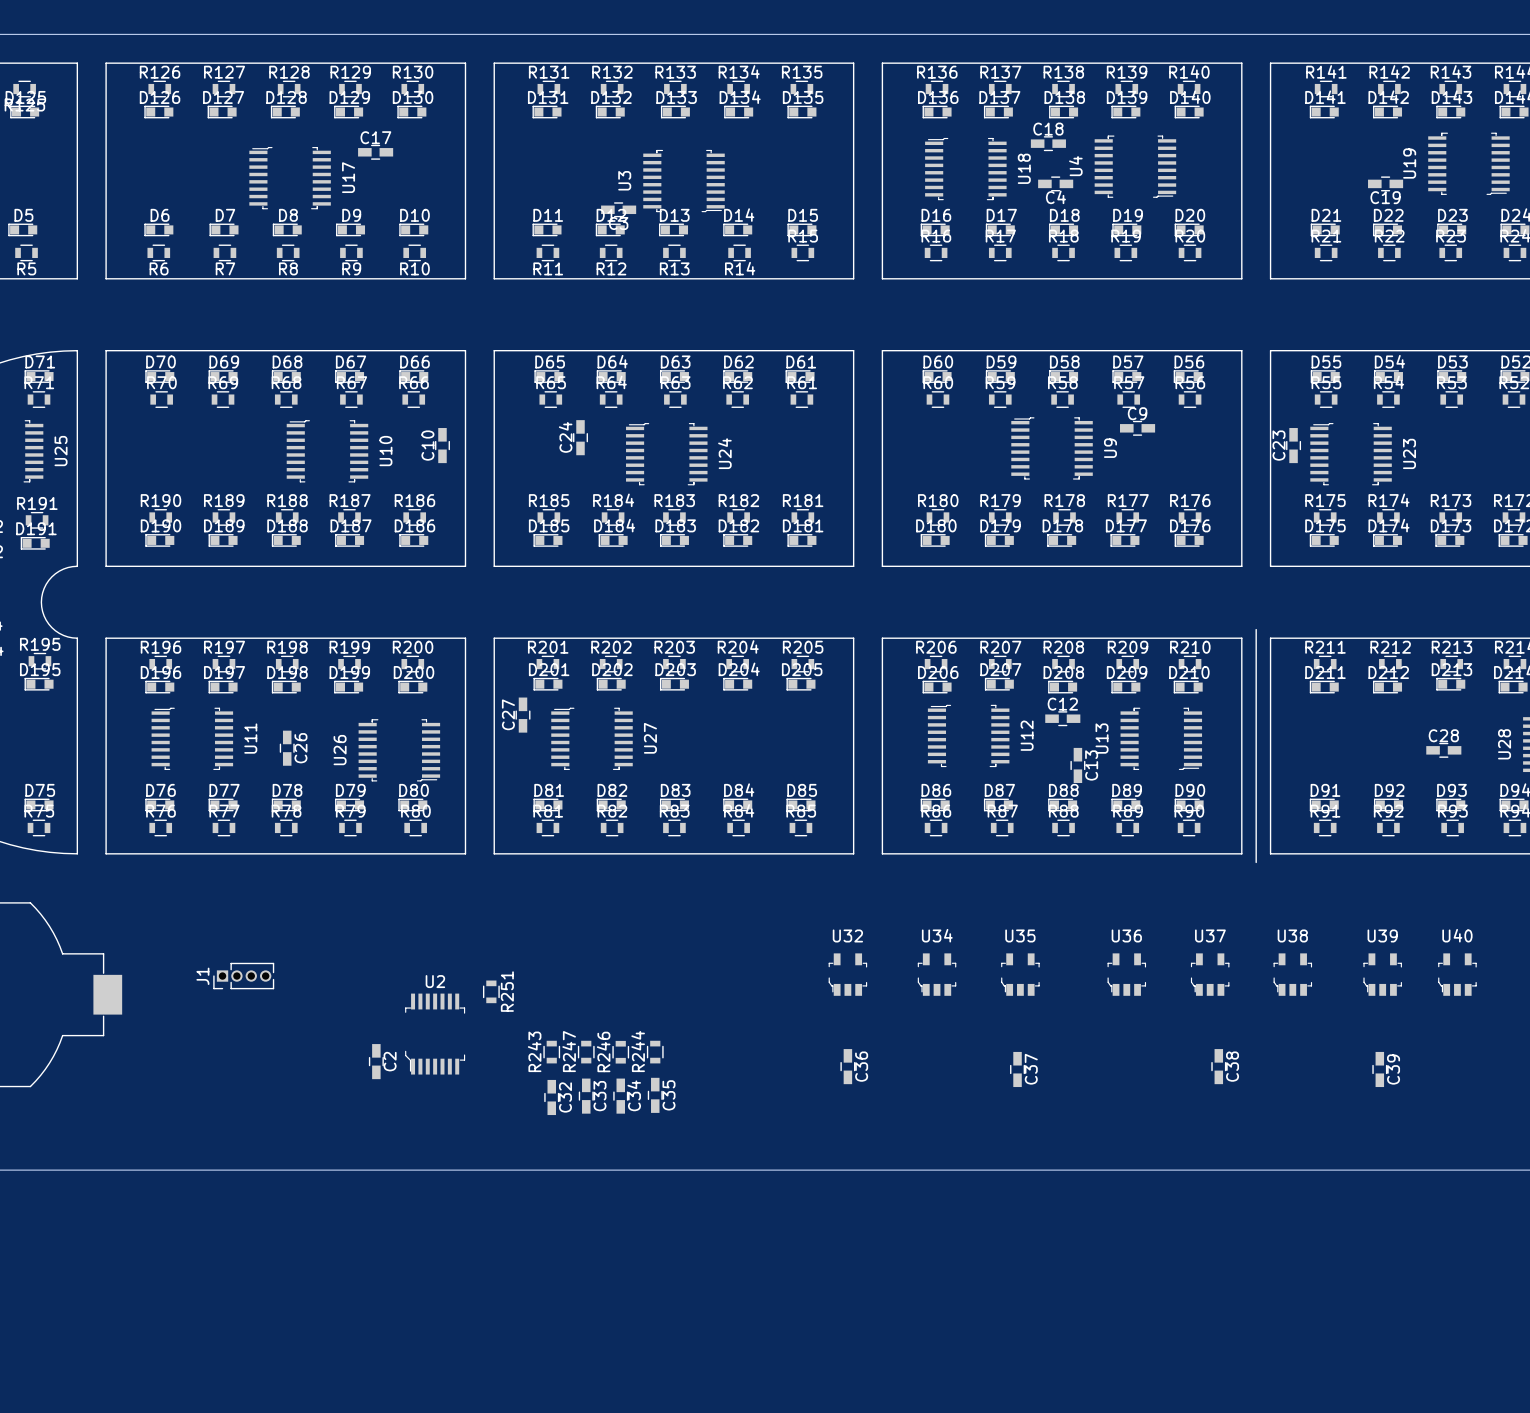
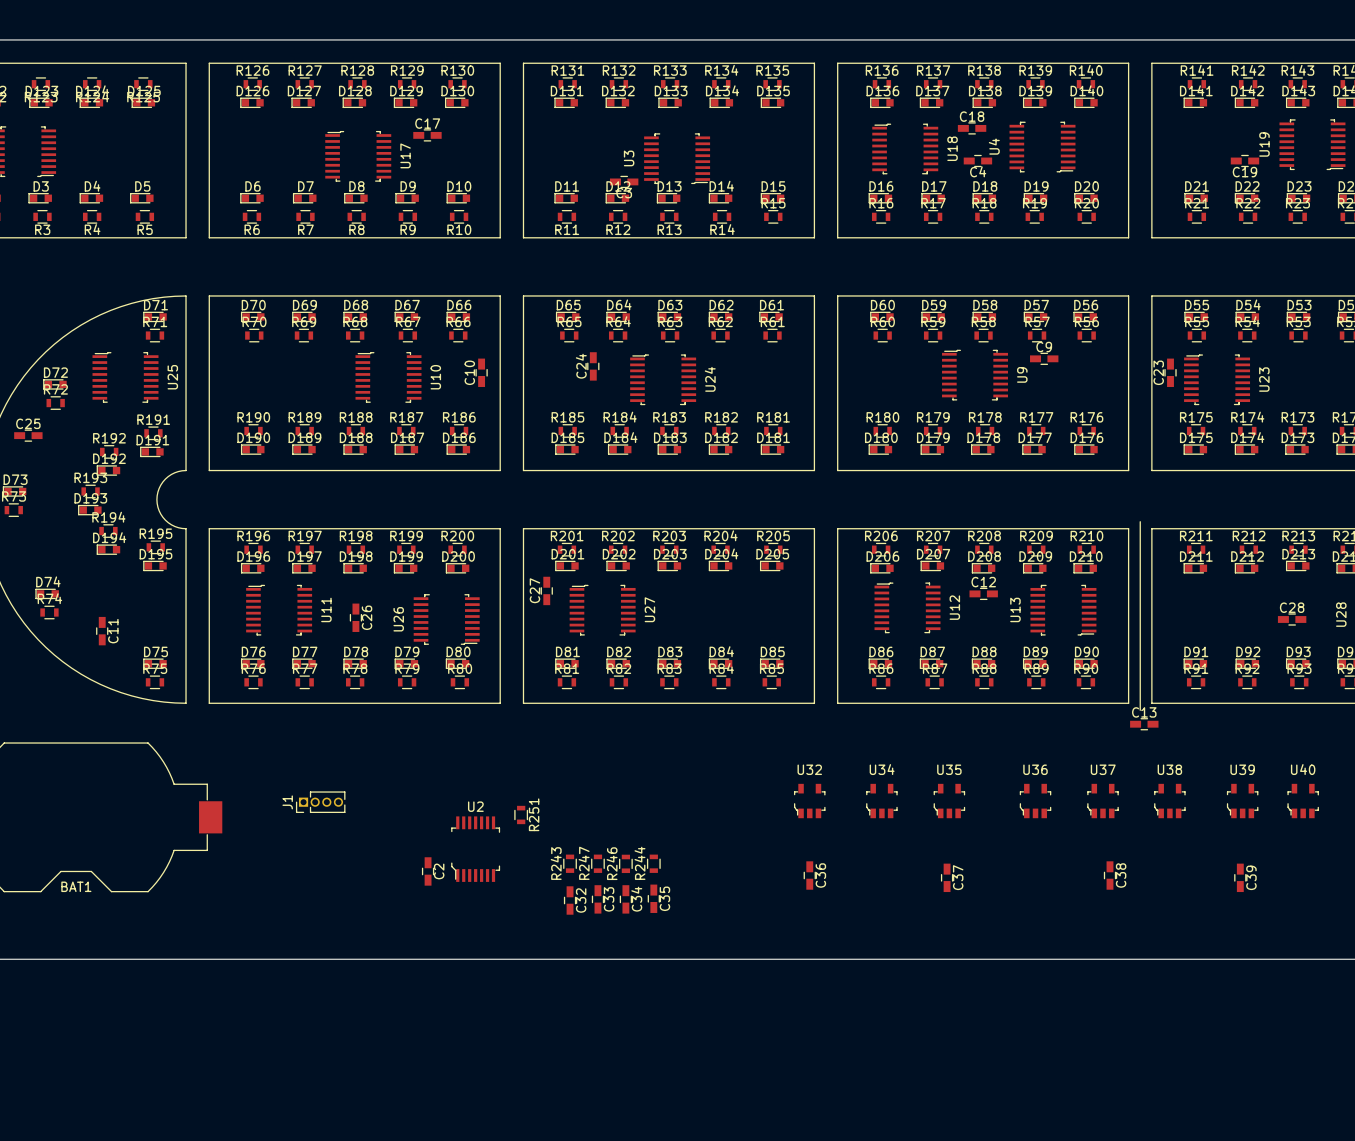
C13 rotation: 0° (1077, 765) -> 90° clockwise (1144, 724)
C13 position: (1077, 765) -> (1144, 724)

